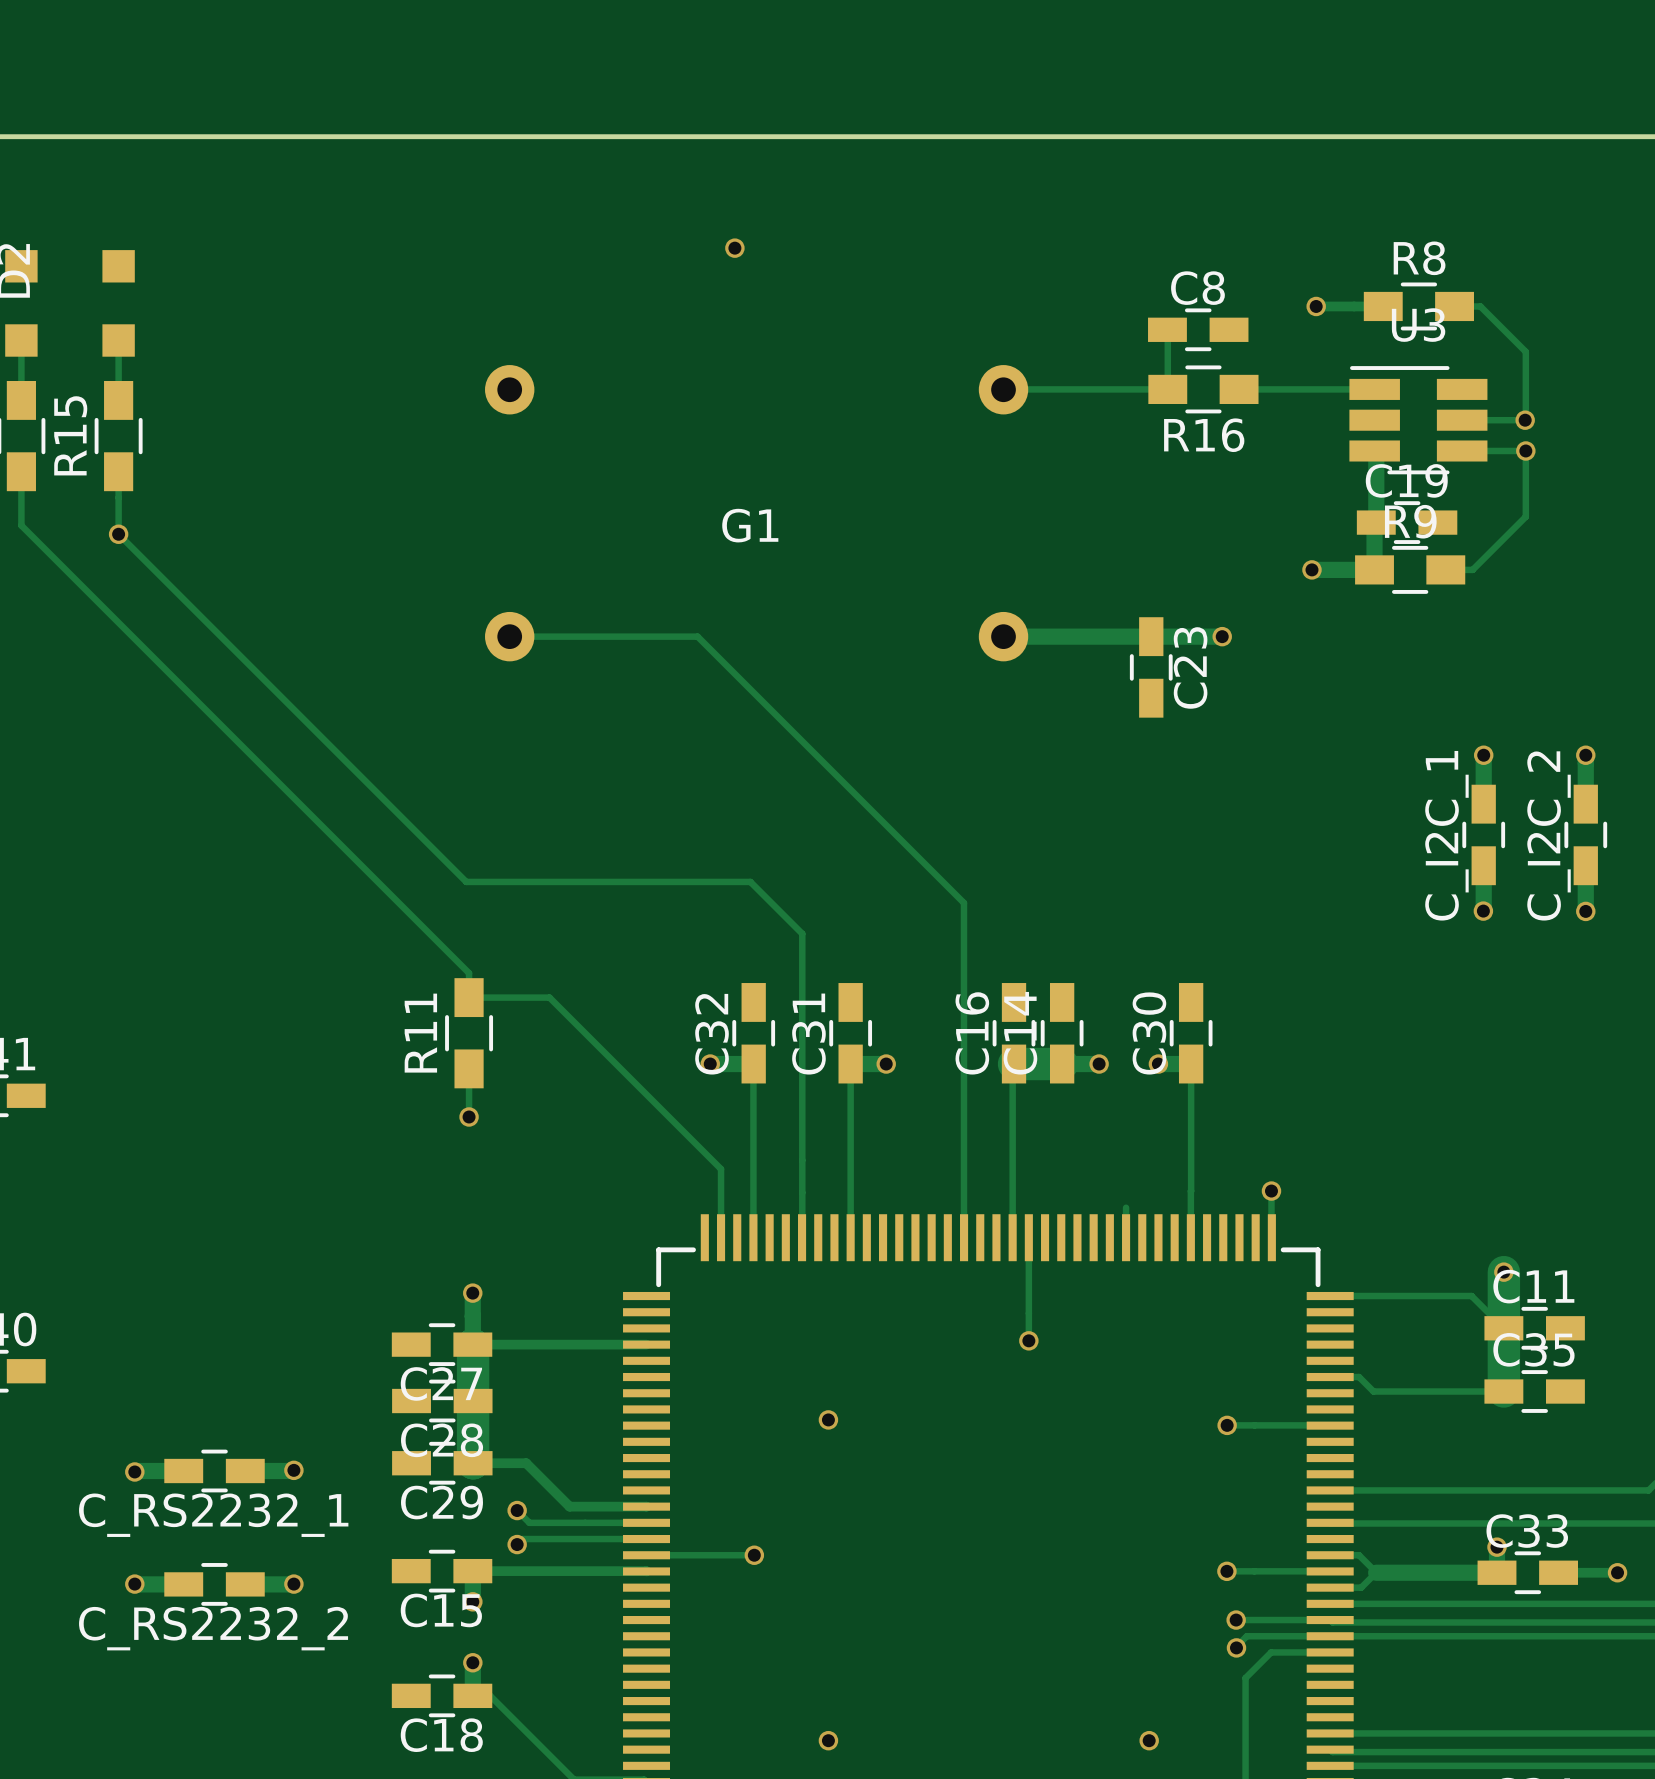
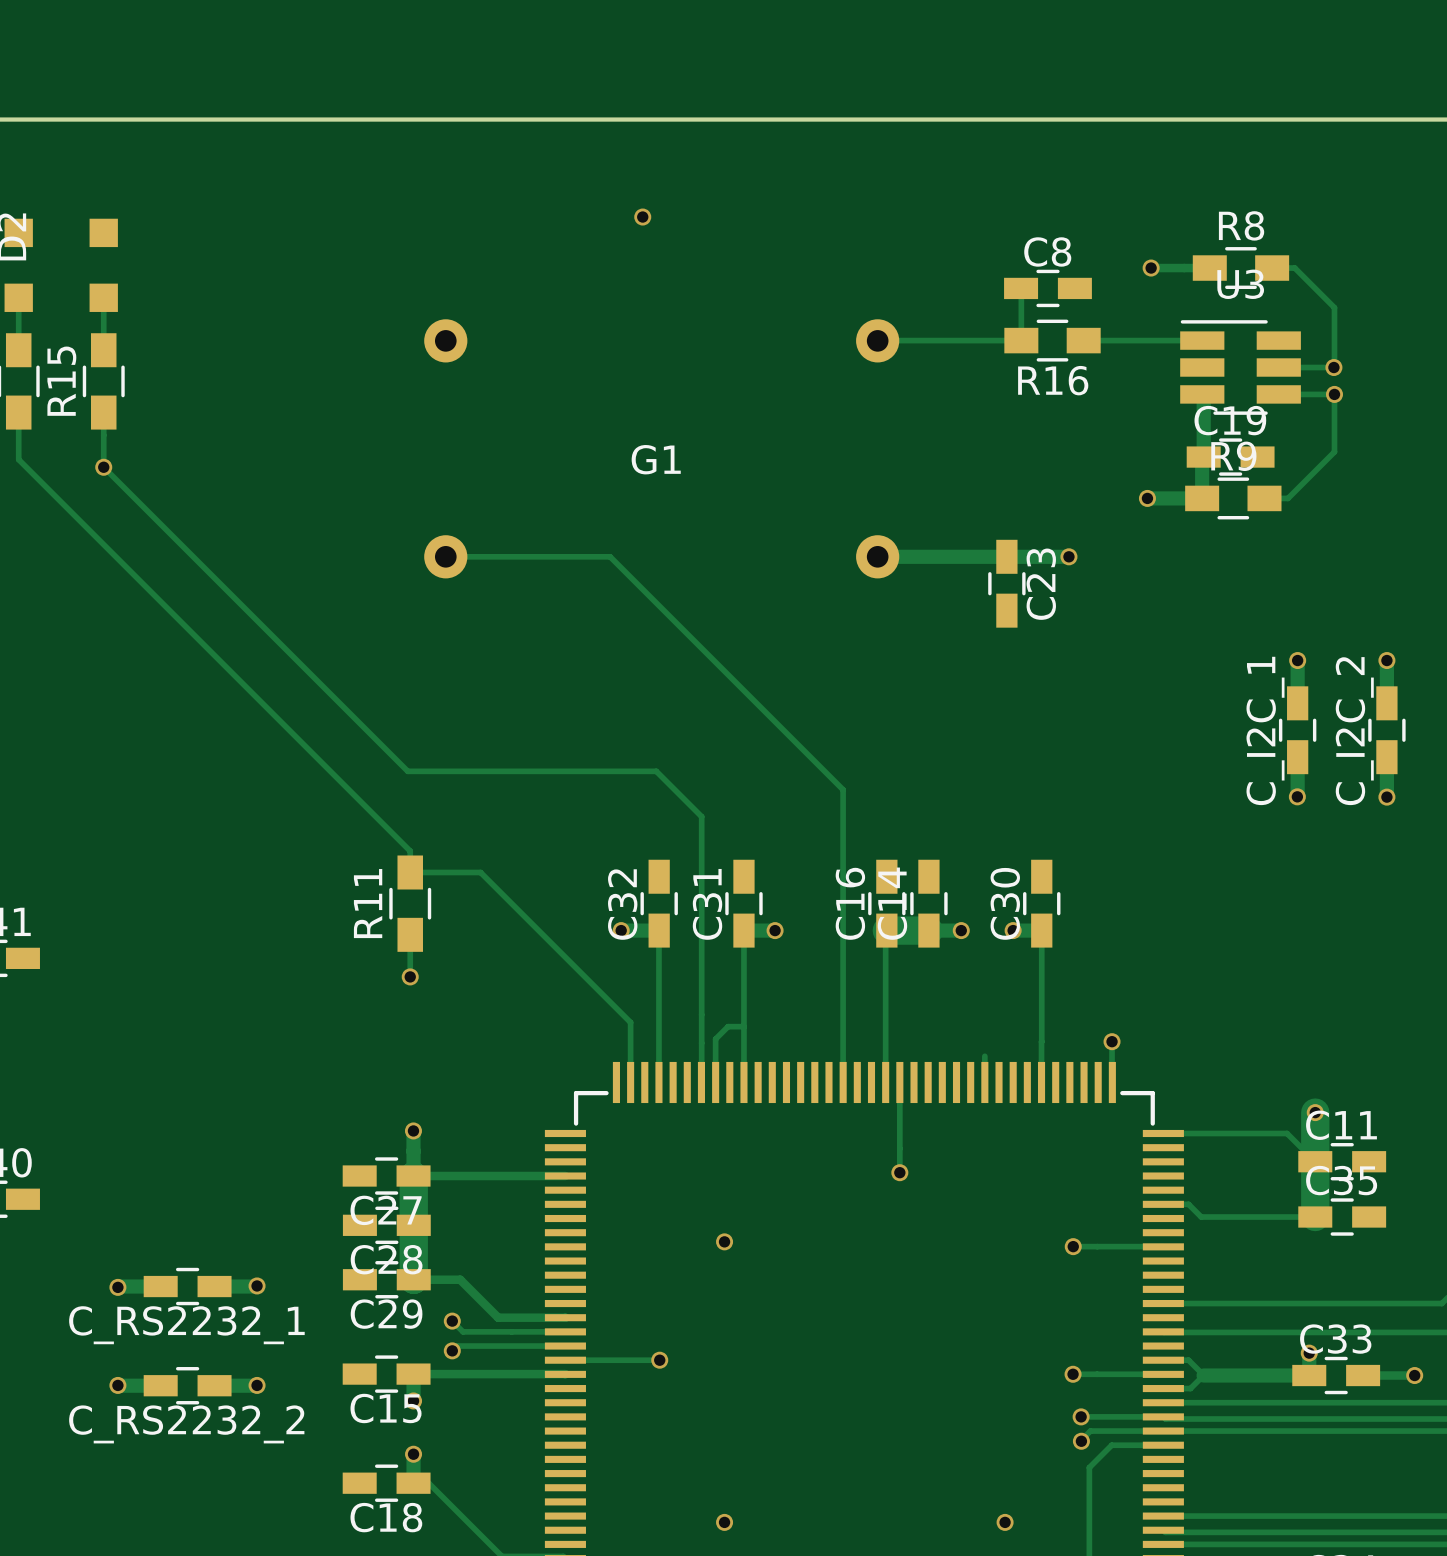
track: none -> (743, 1026) (728, 1026) (715, 1039) (715, 1082)

